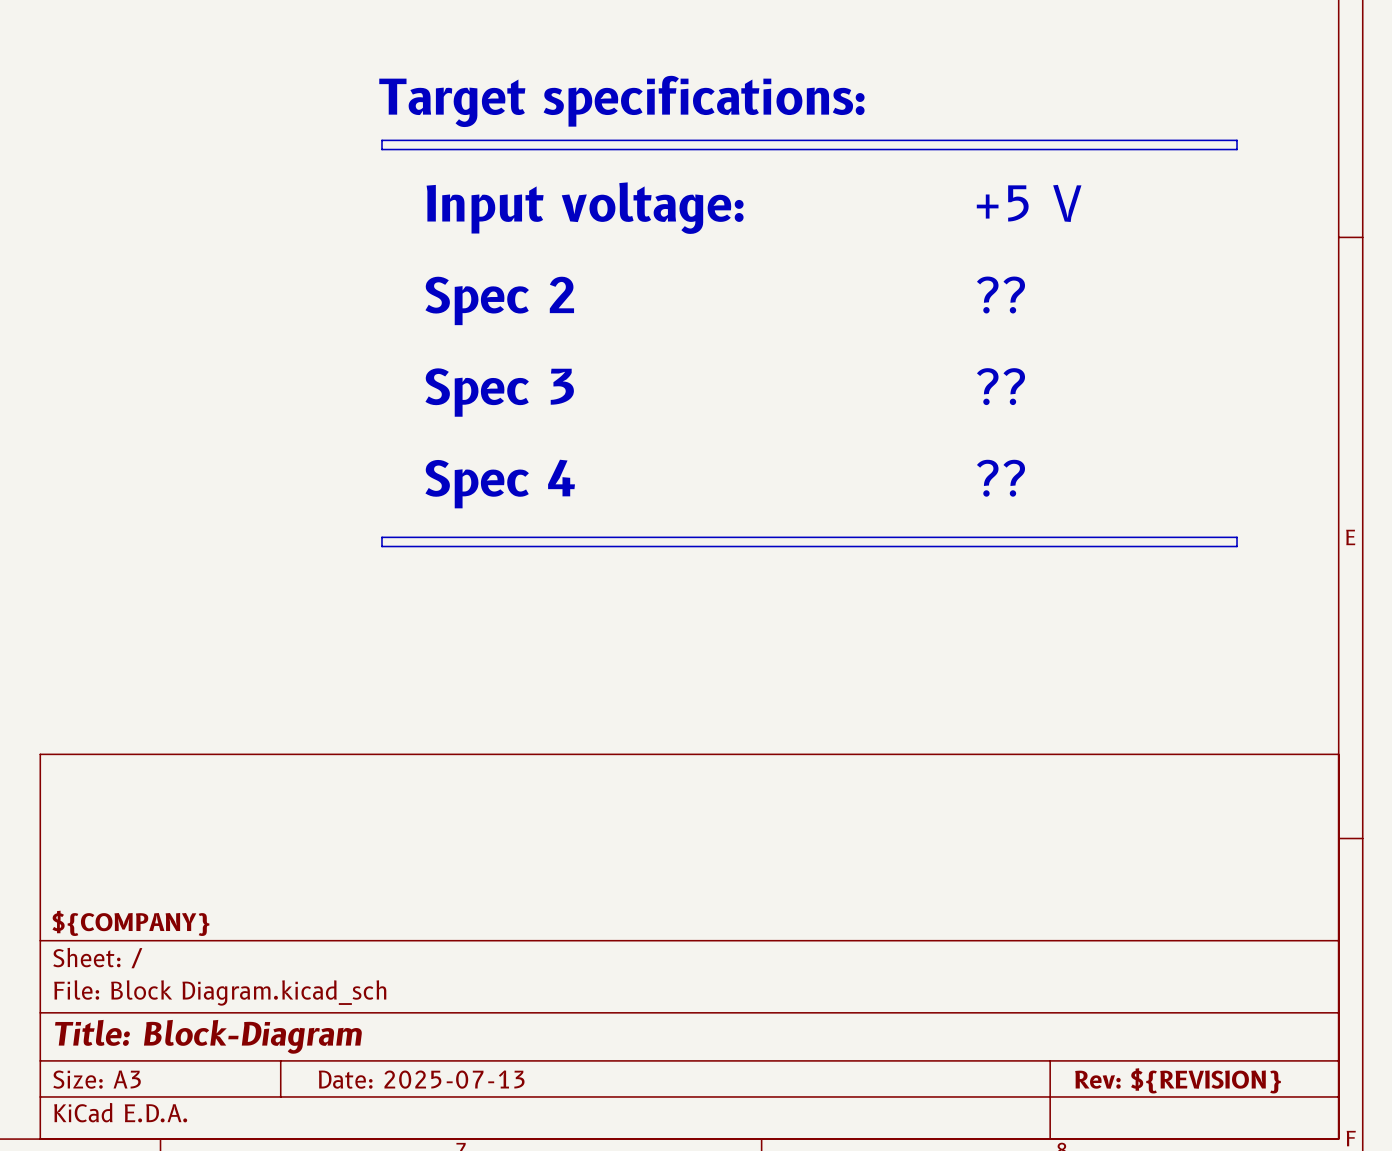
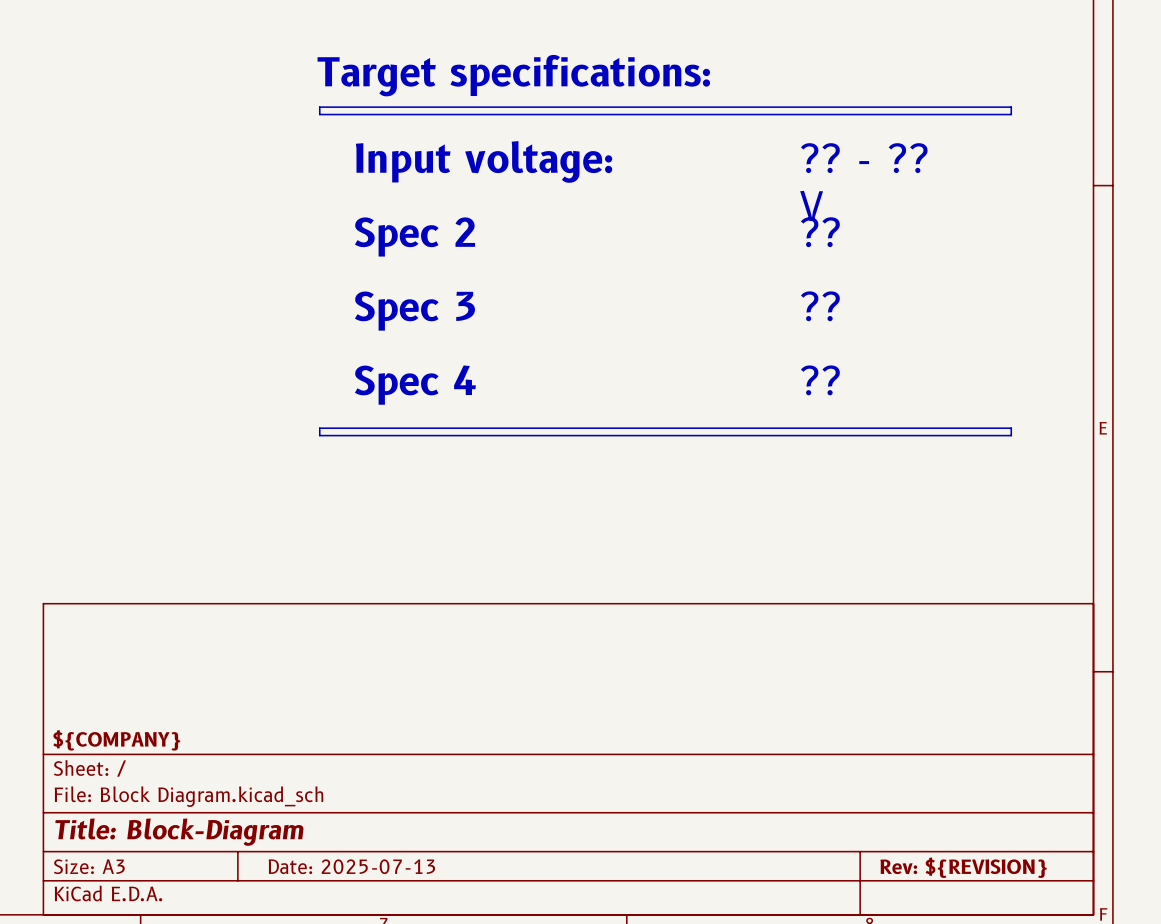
text: +5 V (1029, 203) -> ?? - ?? (864, 158)
text: none -> V (811, 205)

